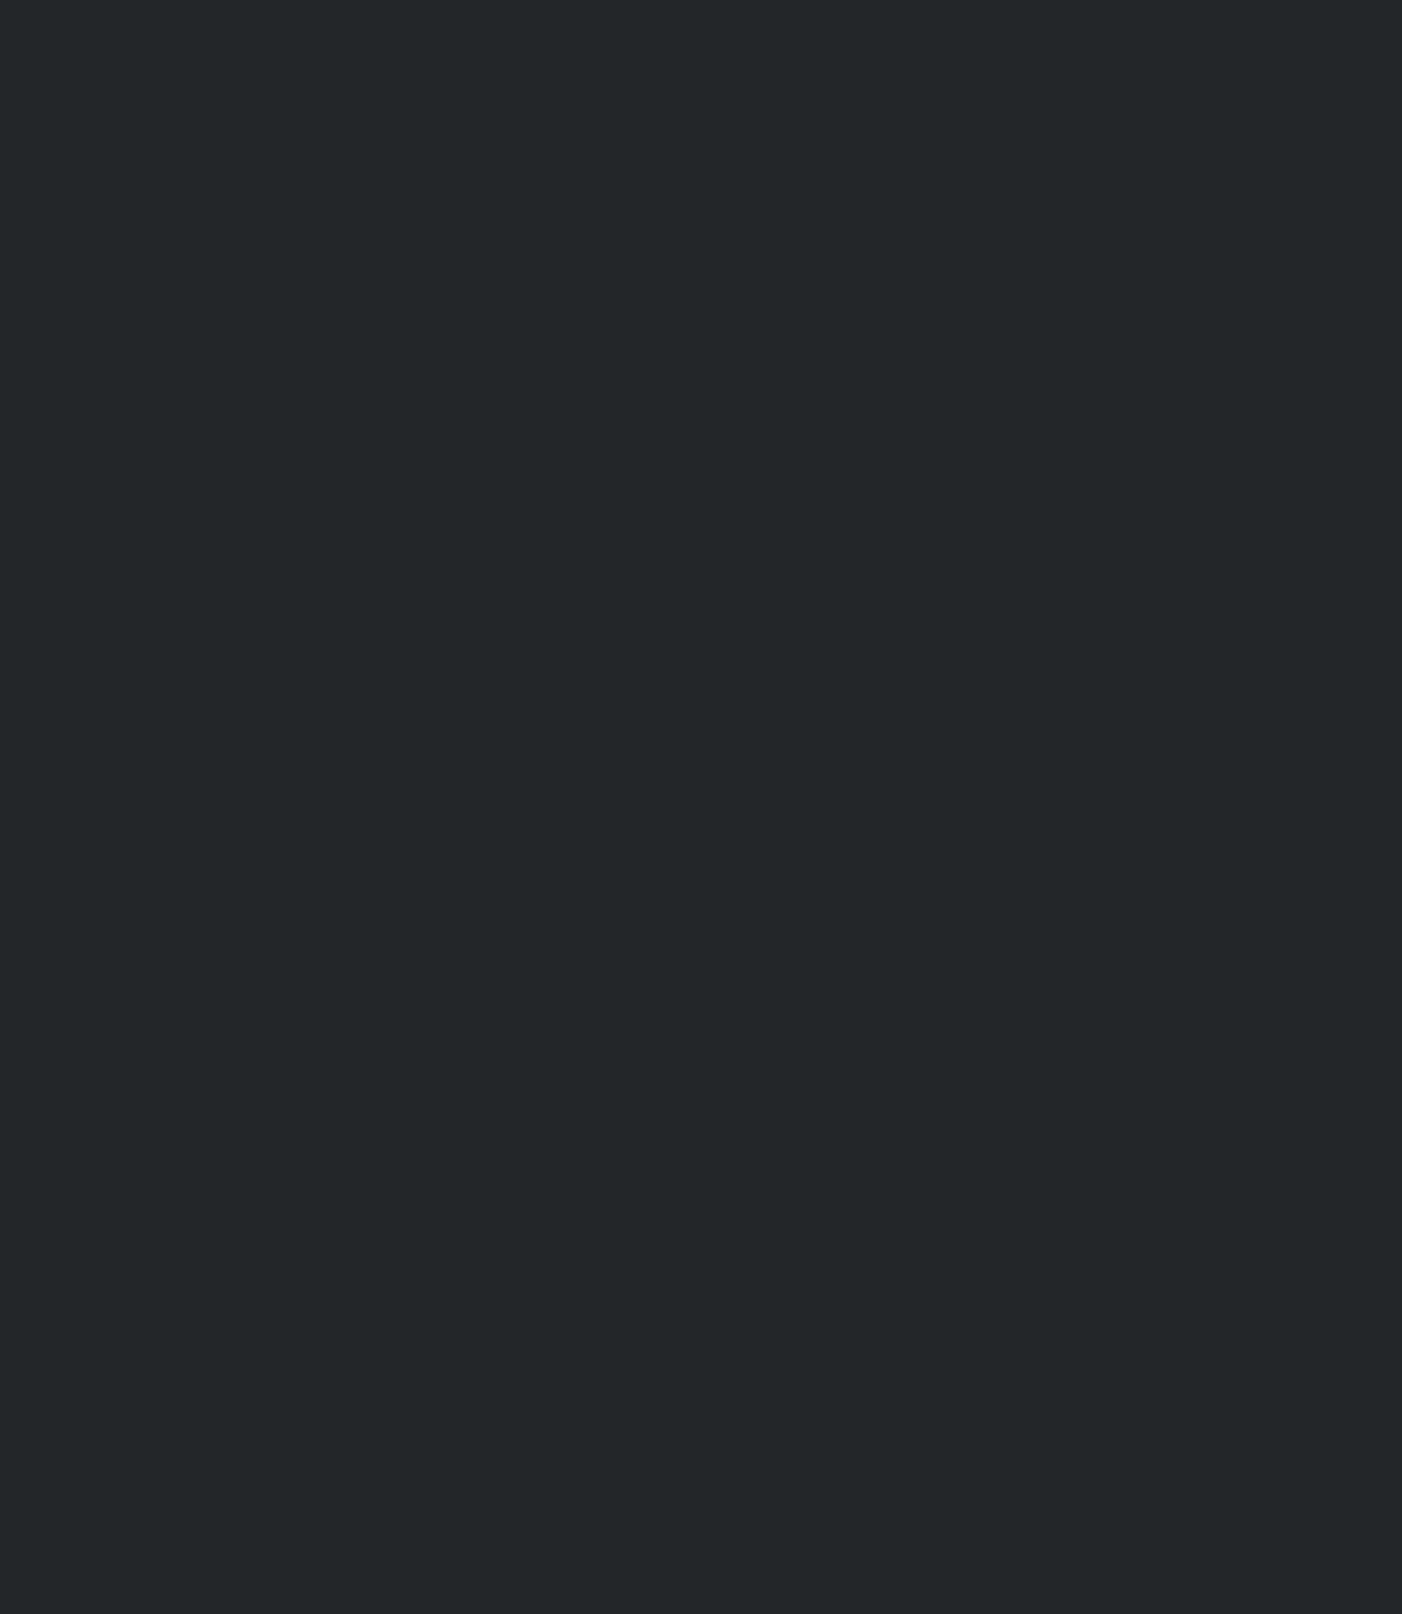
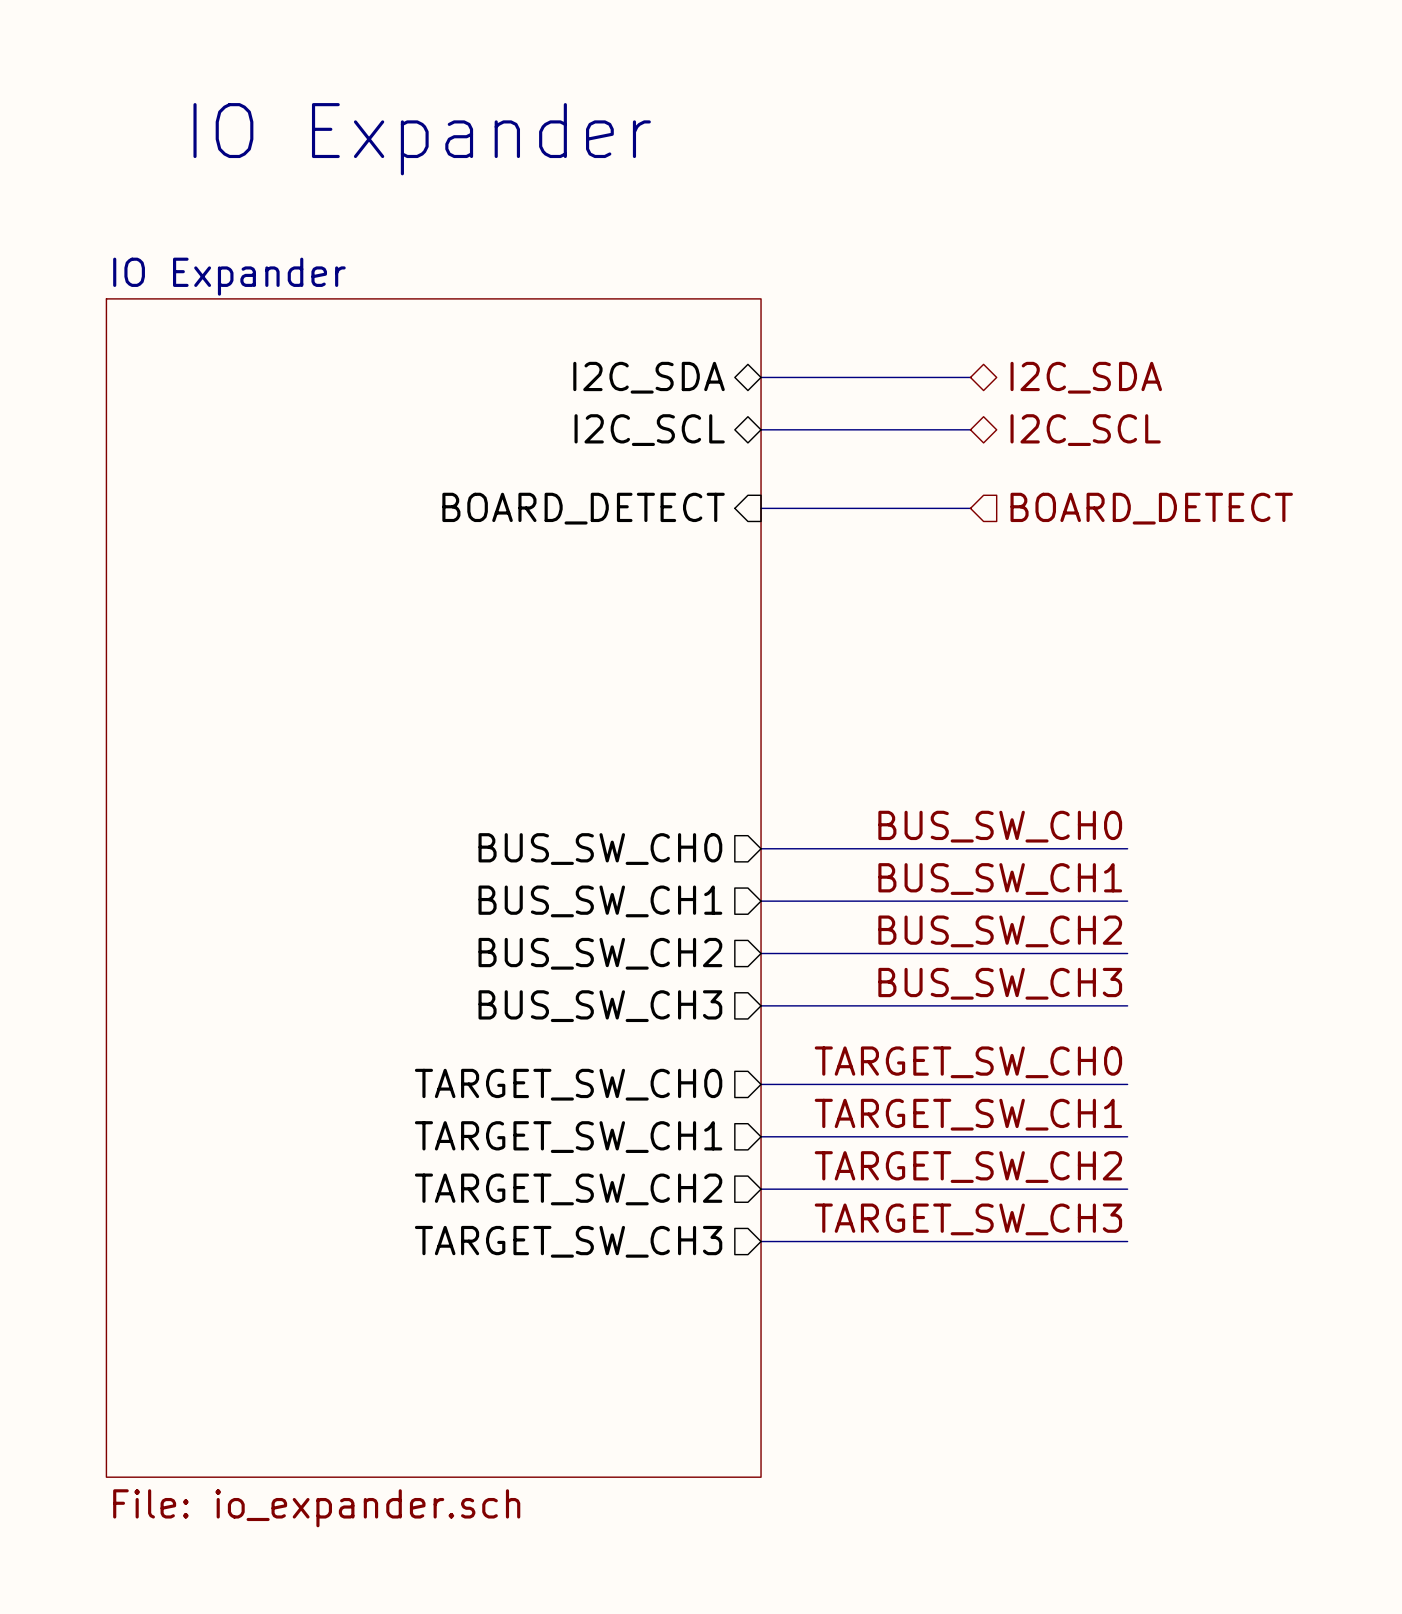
text: none -> IO Expander (422, 139)
sheet pin: none -> I2C_SDA (649, 377)
wire: none -> (761, 377) (970, 377)
hierarchical label: none -> I2C_SDA (1086, 377)
wire: none -> (761, 429) (970, 429)
sheet pin: none -> I2C_SCL (649, 430)
hierarchical label: none -> I2C_SCL (1085, 430)
sheet pin: none -> BOARD_DETECT (583, 508)
wire: none -> (761, 508) (970, 508)
hierarchical label: none -> BOARD_DETECT (1151, 508)
label: none -> BUS_SW_CH0 (1000, 826)
wire: none -> (761, 848) (1127, 848)
sheet pin: none -> BUS_SW_CH0 (600, 849)
label: none -> BUS_SW_CH1 (1000, 879)
sheet IO Expander: none -> File: io_expander.sch (433, 888)
sheet pin: none -> BUS_SW_CH1 (600, 901)
wire: none -> (761, 901) (1127, 901)
label: none -> BUS_SW_CH2 (1000, 931)
sheet pin: none -> BUS_SW_CH2 (600, 953)
wire: none -> (761, 953) (1127, 953)
label: none -> BUS_SW_CH3 (1000, 983)
wire: none -> (761, 1005) (1127, 1005)
sheet pin: none -> BUS_SW_CH3 (600, 1006)
label: none -> TARGET_SW_CH0 (968, 1062)
sheet pin: none -> TARGET_SW_CH0 (568, 1084)
wire: none -> (761, 1084) (1127, 1084)
label: none -> TARGET_SW_CH1 (968, 1114)
wire: none -> (761, 1136) (1127, 1136)
sheet pin: none -> TARGET_SW_CH1 (568, 1137)
label: none -> TARGET_SW_CH2 (968, 1167)
sheet pin: none -> TARGET_SW_CH2 (568, 1189)
wire: none -> (761, 1189) (1127, 1189)
label: none -> TARGET_SW_CH3 (968, 1219)
sheet pin: none -> TARGET_SW_CH3 (568, 1241)
wire: none -> (761, 1241) (1127, 1241)

